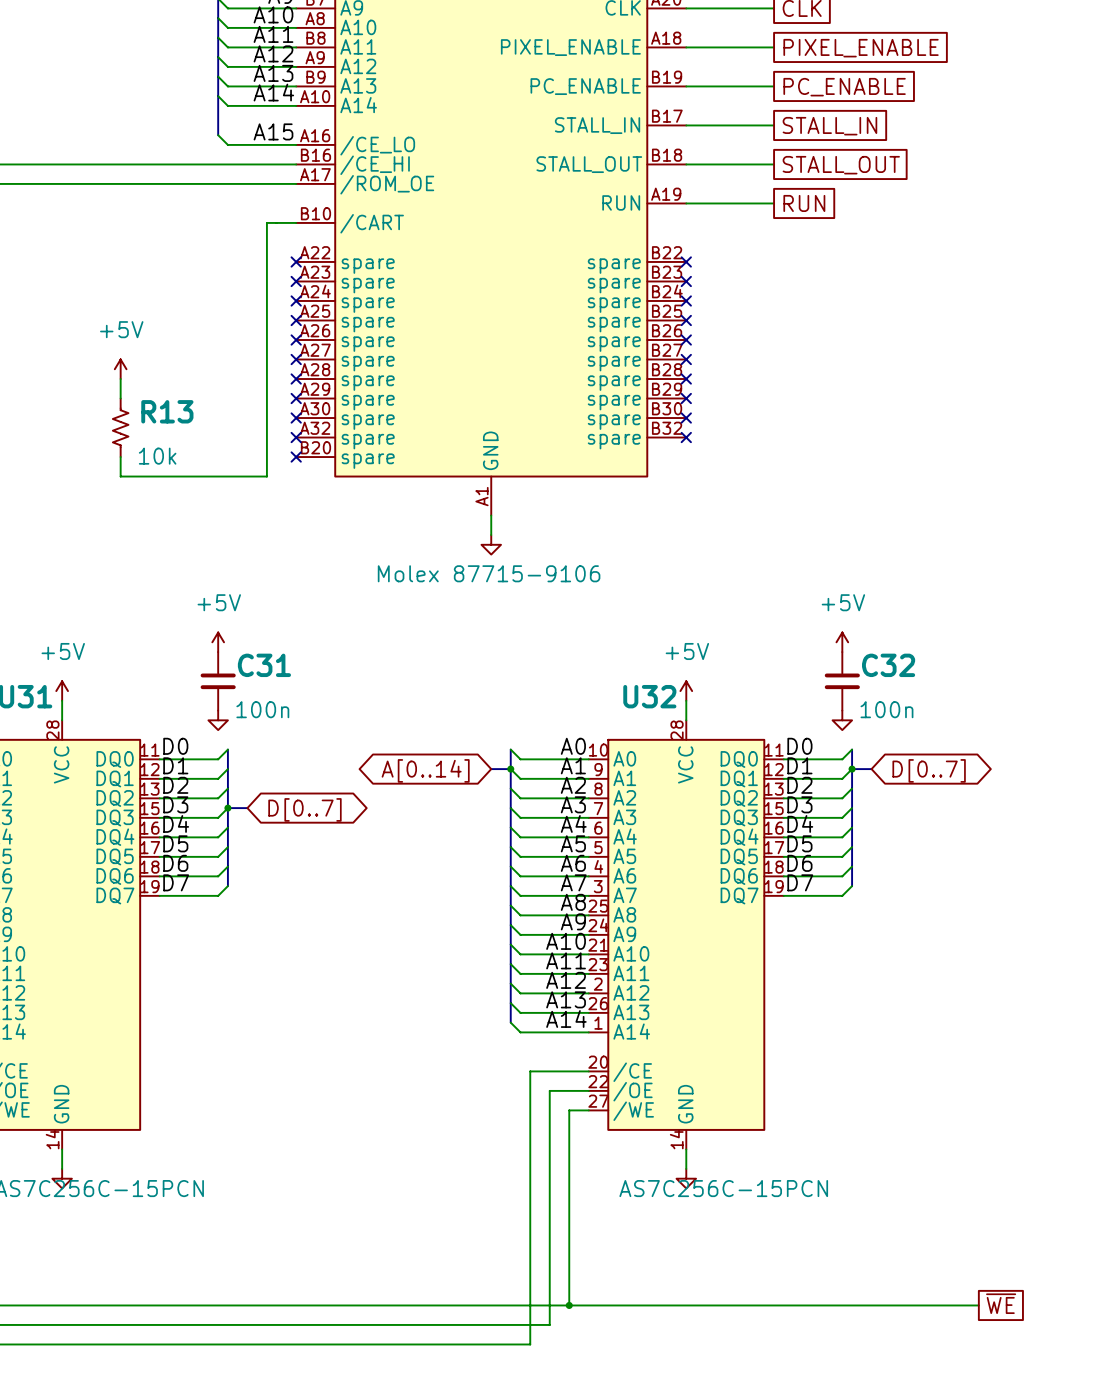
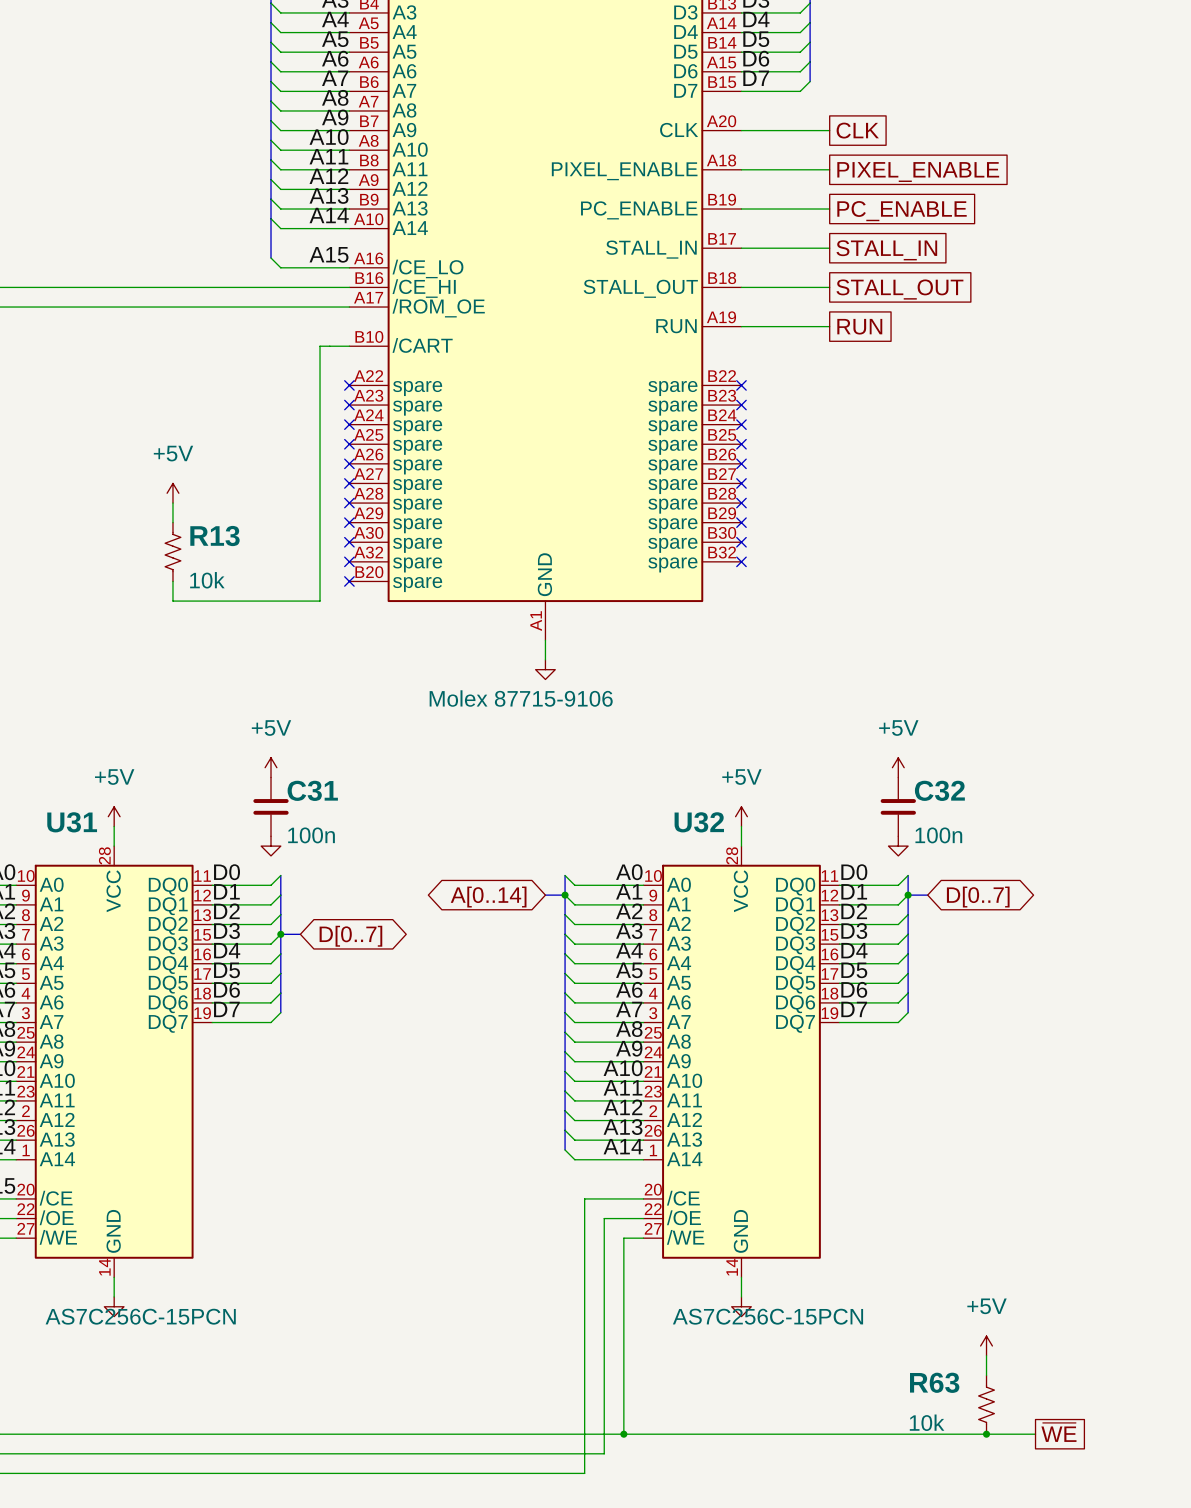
power symbol: none -> +5V (986, 1345)
wire: none -> (986, 1355) (986, 1375)
R63: none -> 10k (986, 1404)
junction: none -> (986, 1434)

